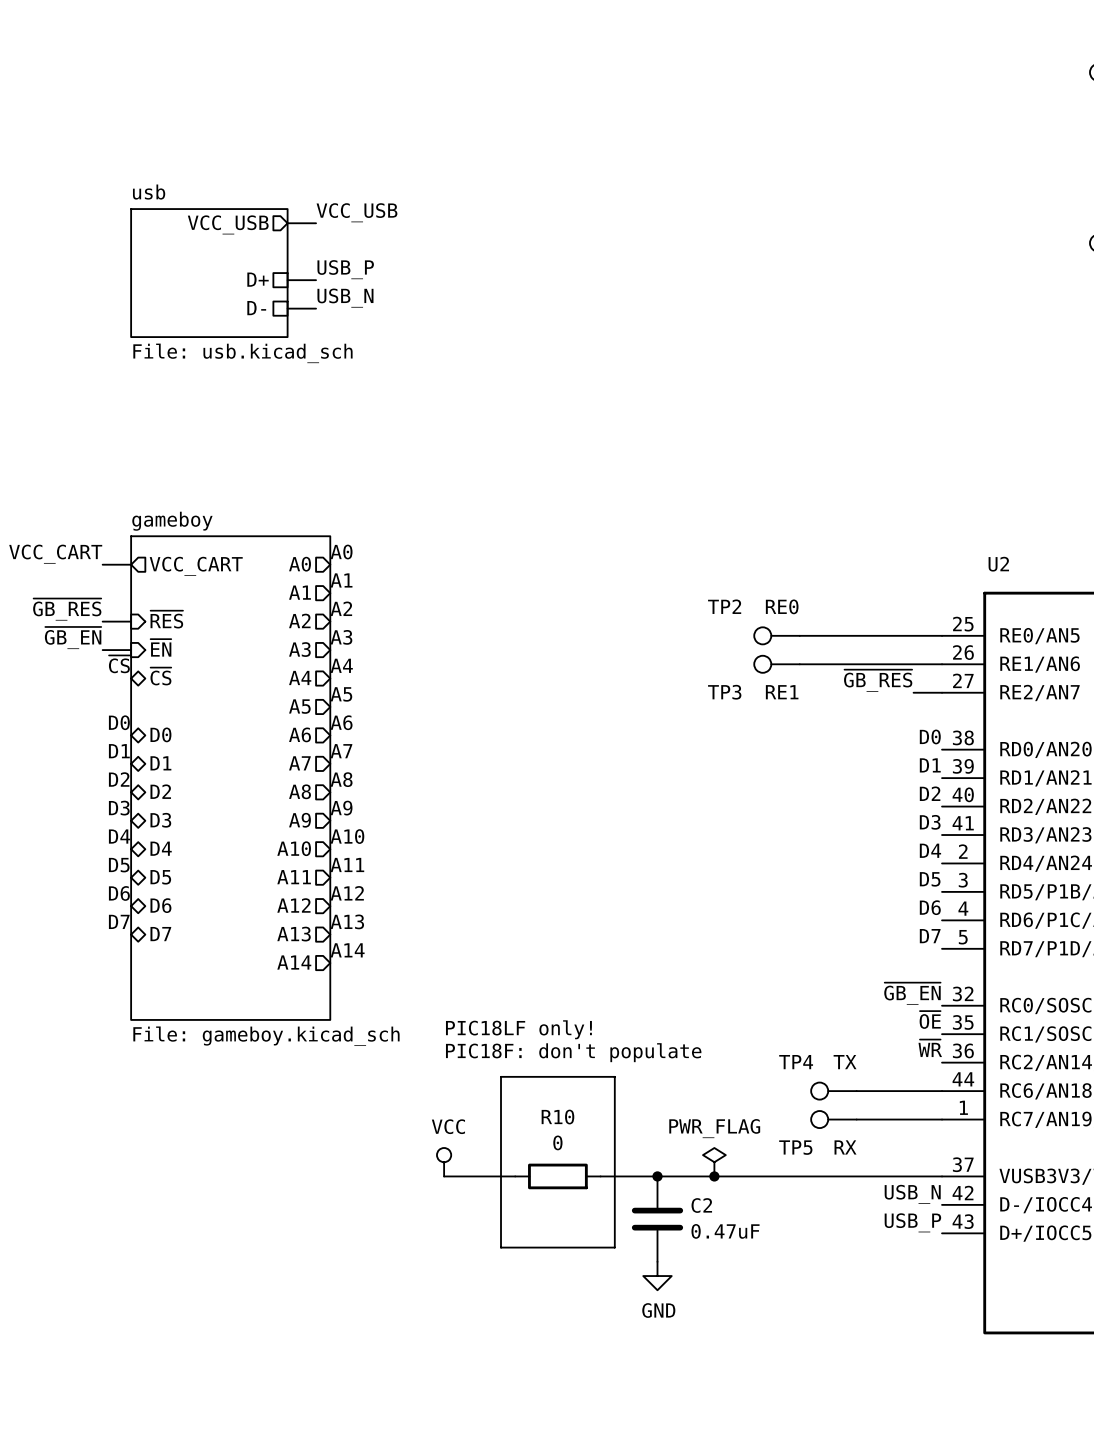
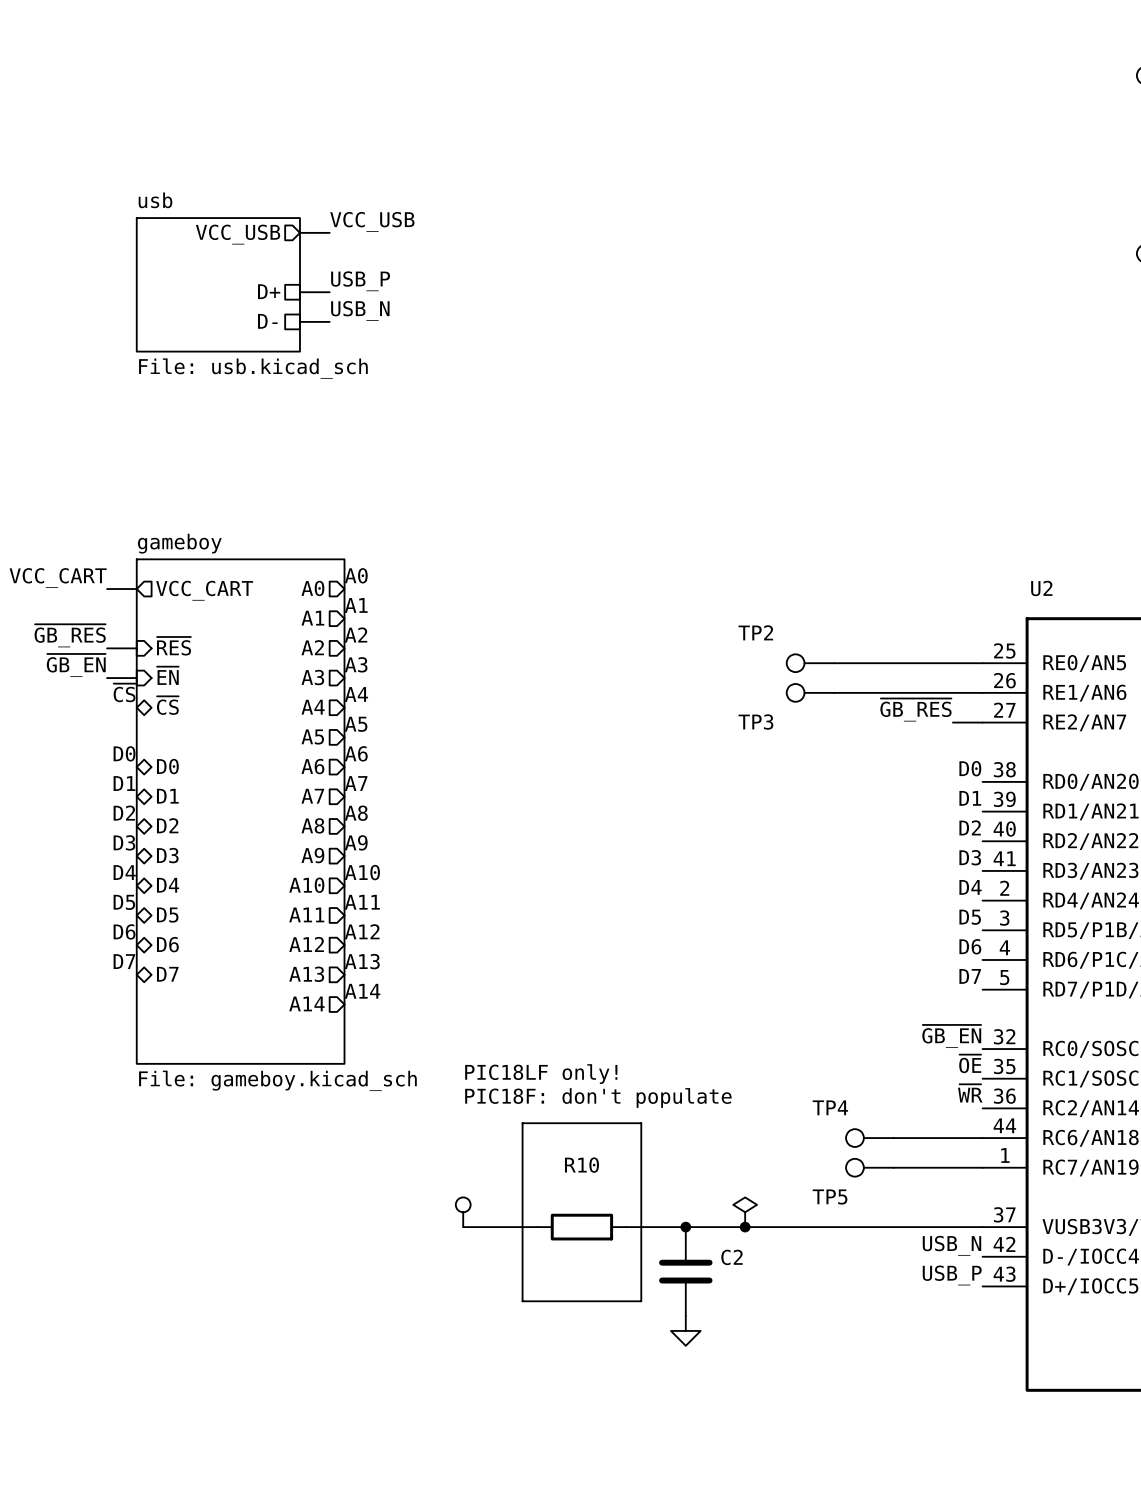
TP2 value: RE0 (782, 606) -> none
TP3 value: RE1 (782, 692) -> none
TP4 value: TX (845, 1062) -> none
power symbol text: VCC (448, 1126) -> none
power symbol text: PWR_FLAG (714, 1128) -> none
R10 value: 0 (557, 1142) -> none
TP5 value: RX (845, 1147) -> none
C2 value: 0.47uF (725, 1231) -> none
power symbol text: GND (658, 1310) -> none

